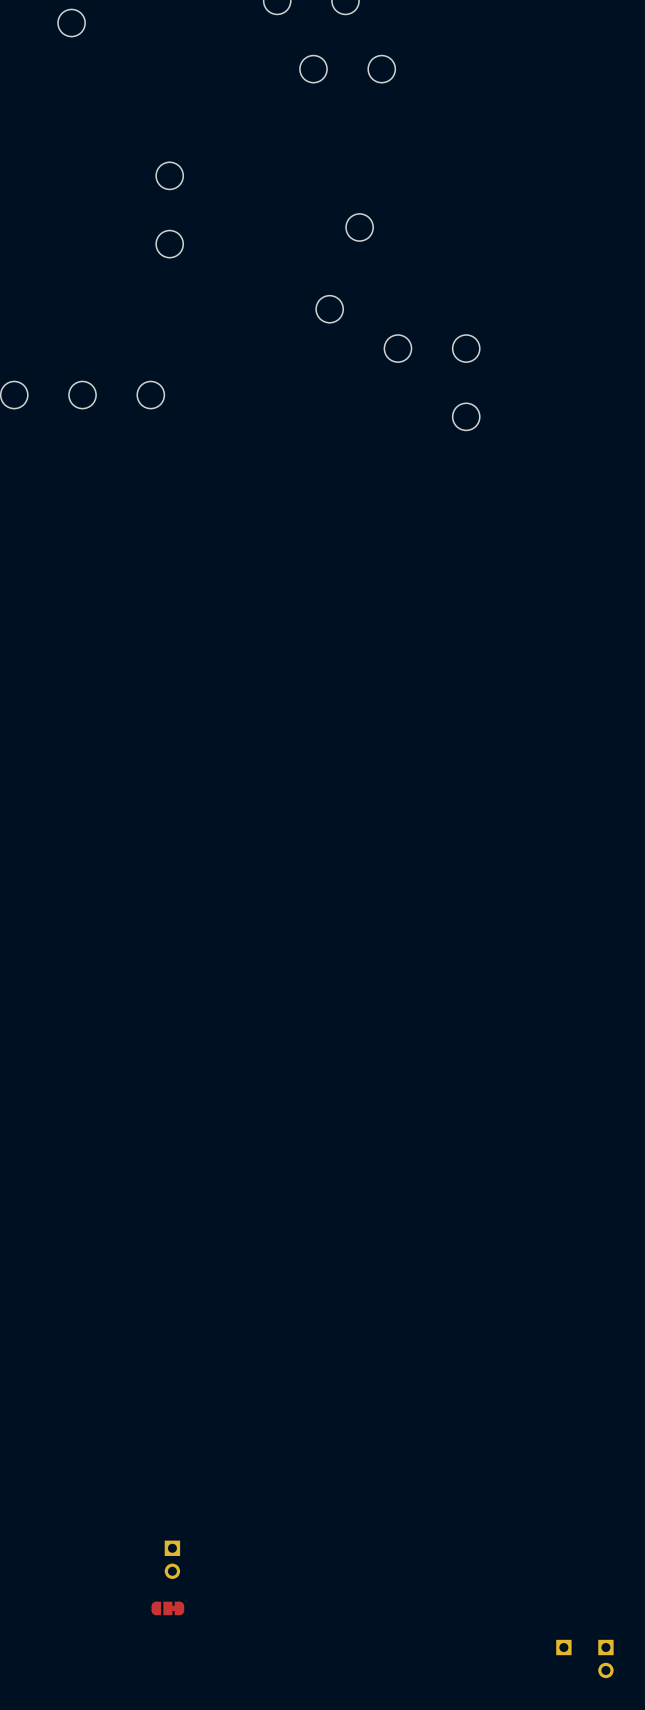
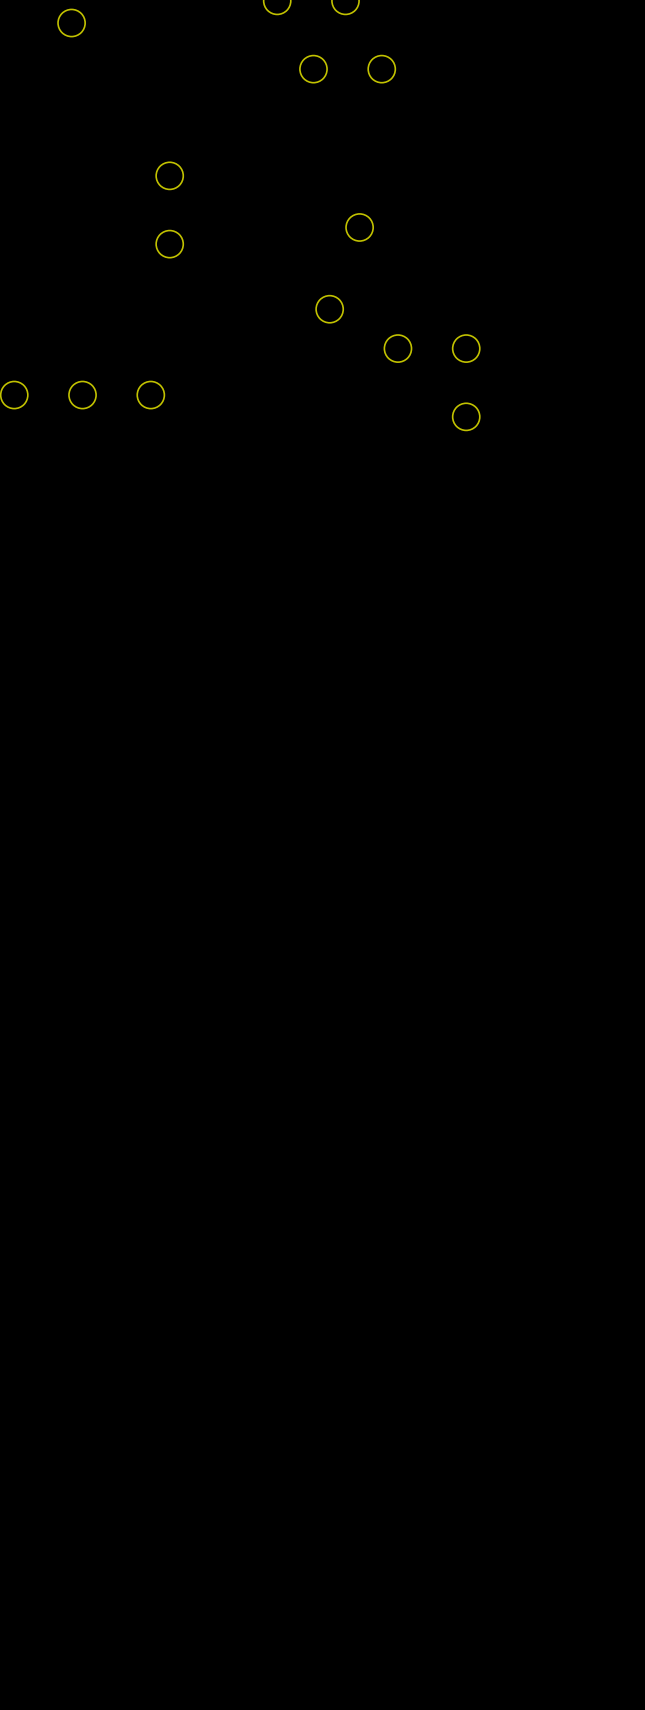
part: (172, 1559) -> none
part: (167, 1608) -> none
part: (563, 1647) -> none
part: (605, 1658) -> none

